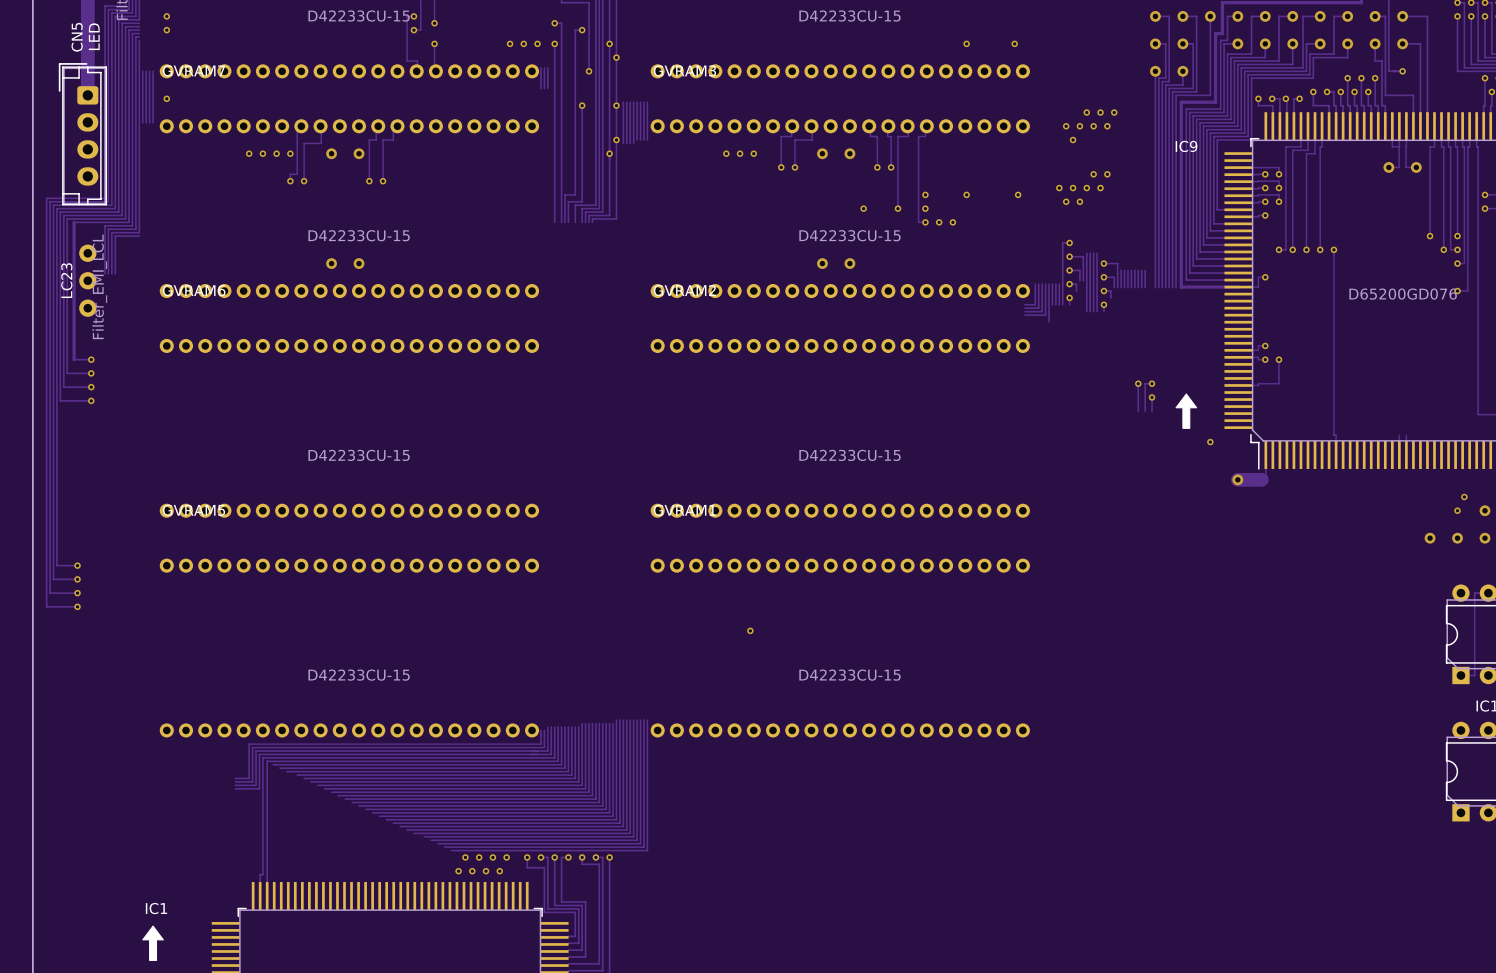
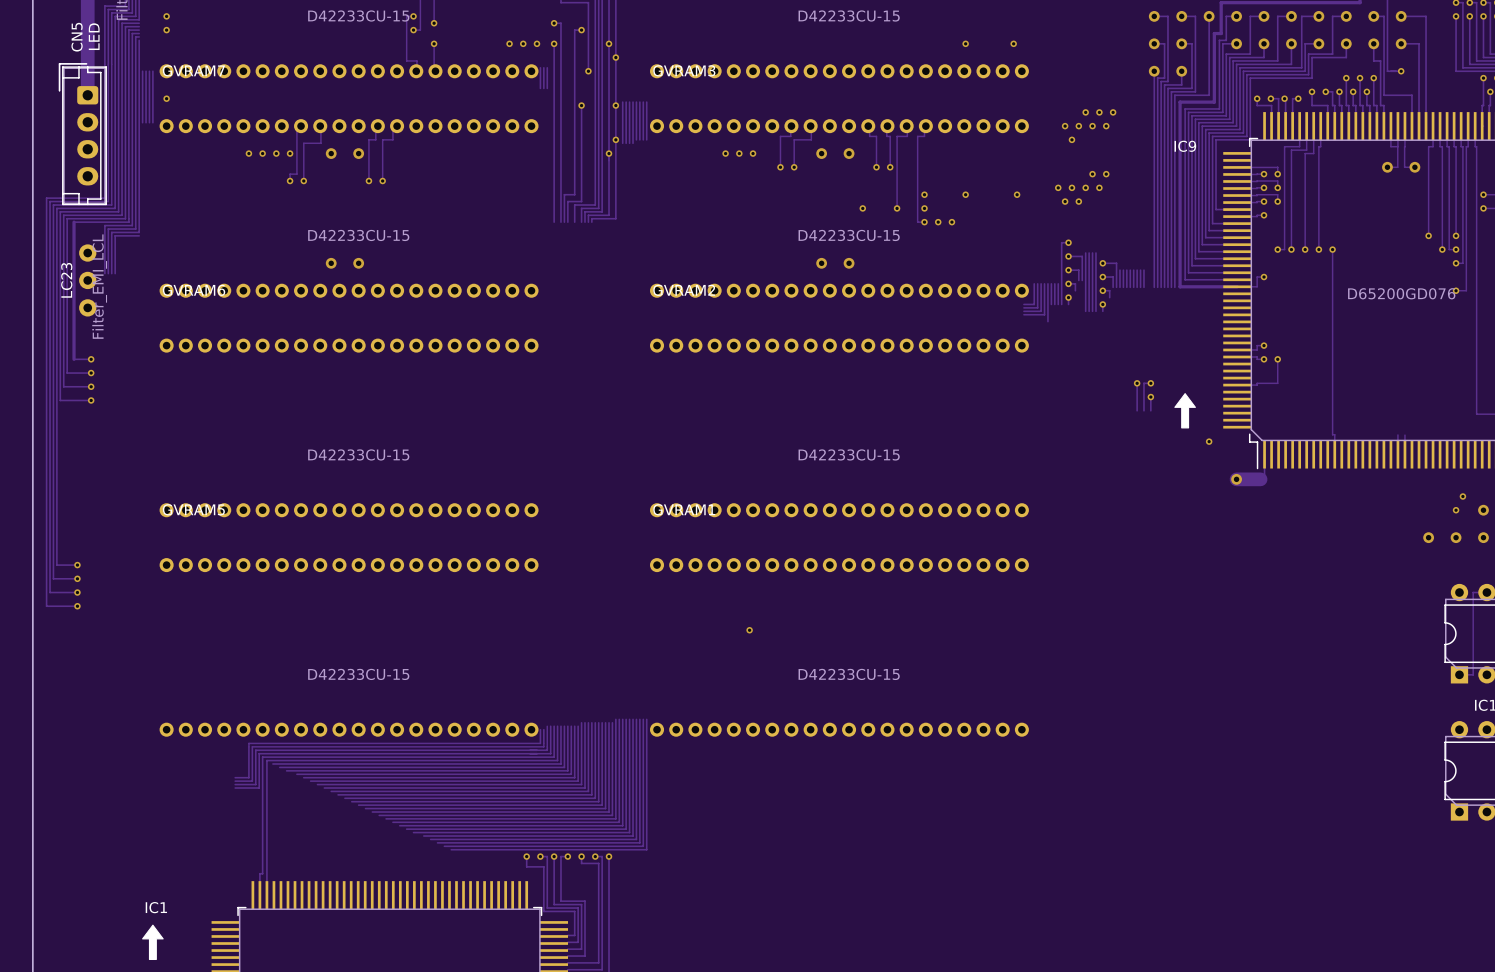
via: (465, 857) -> none
via: (479, 857) -> none
via: (492, 857) -> none
via: (506, 857) -> none
via: (458, 871) -> none
via: (472, 871) -> none
via: (486, 871) -> none
via: (499, 871) -> none

